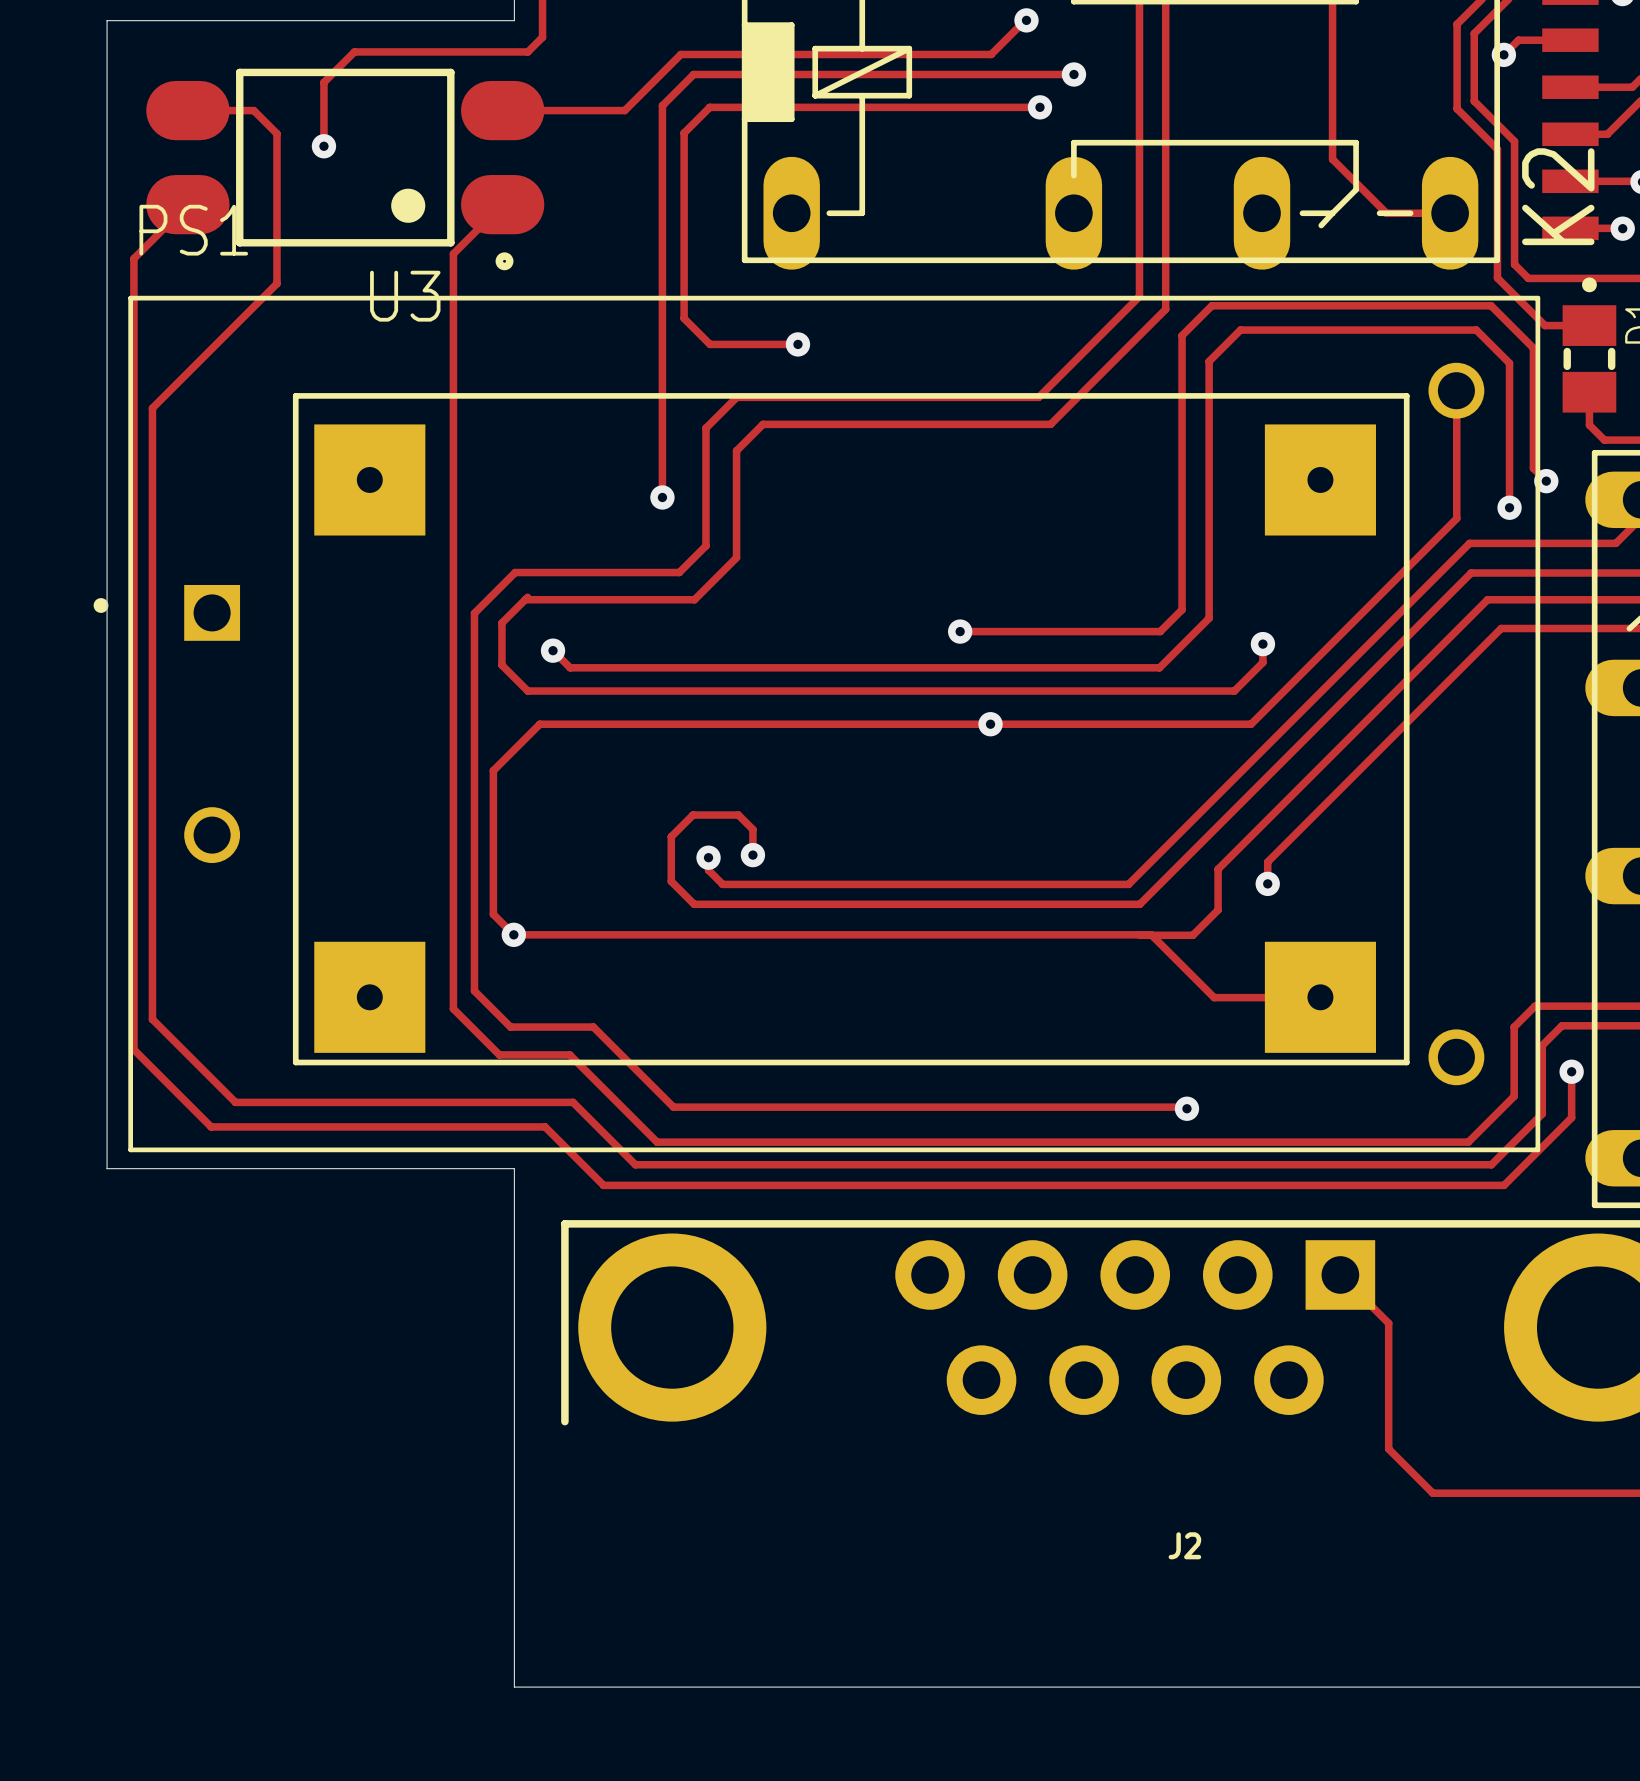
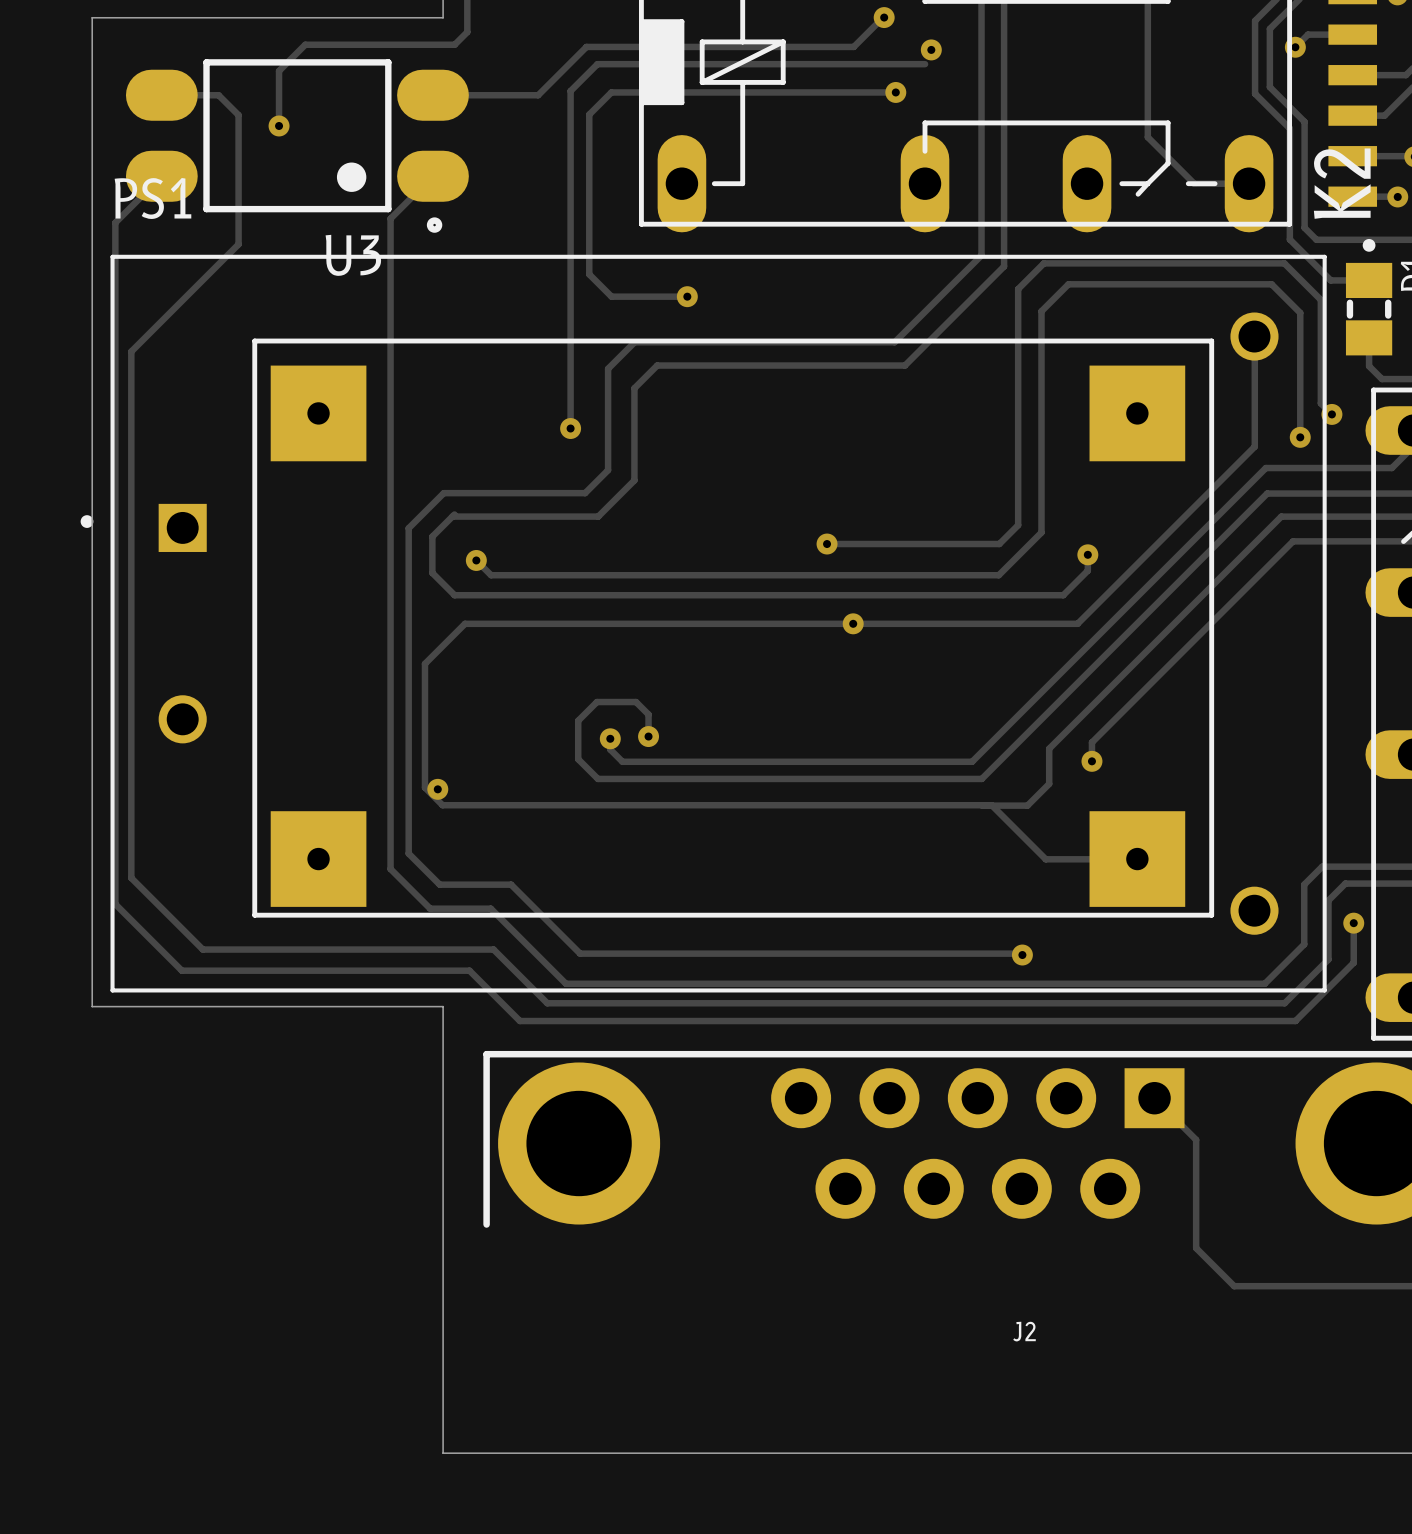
via position: (1073, 74) -> (931, 49)
via position: (513, 934) -> (437, 789)

